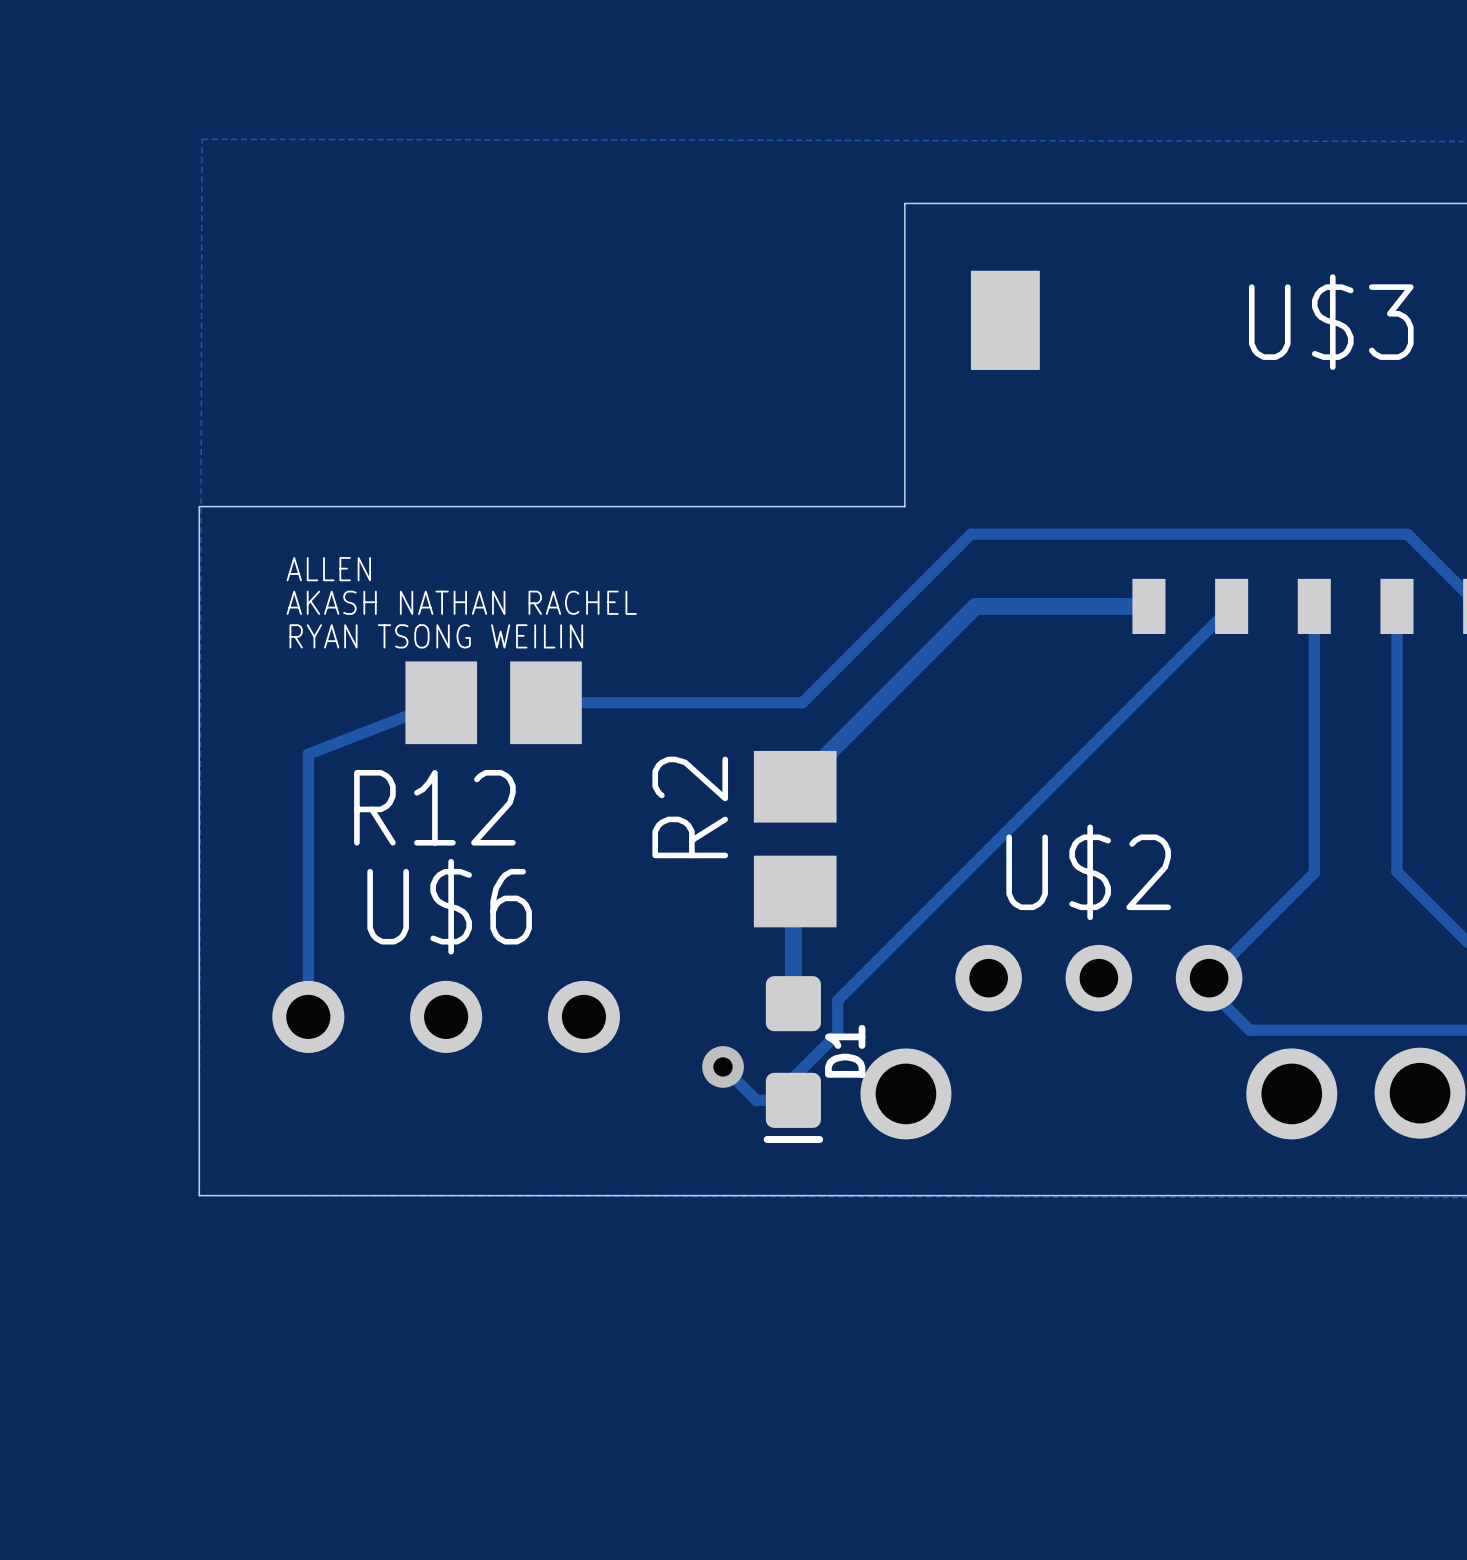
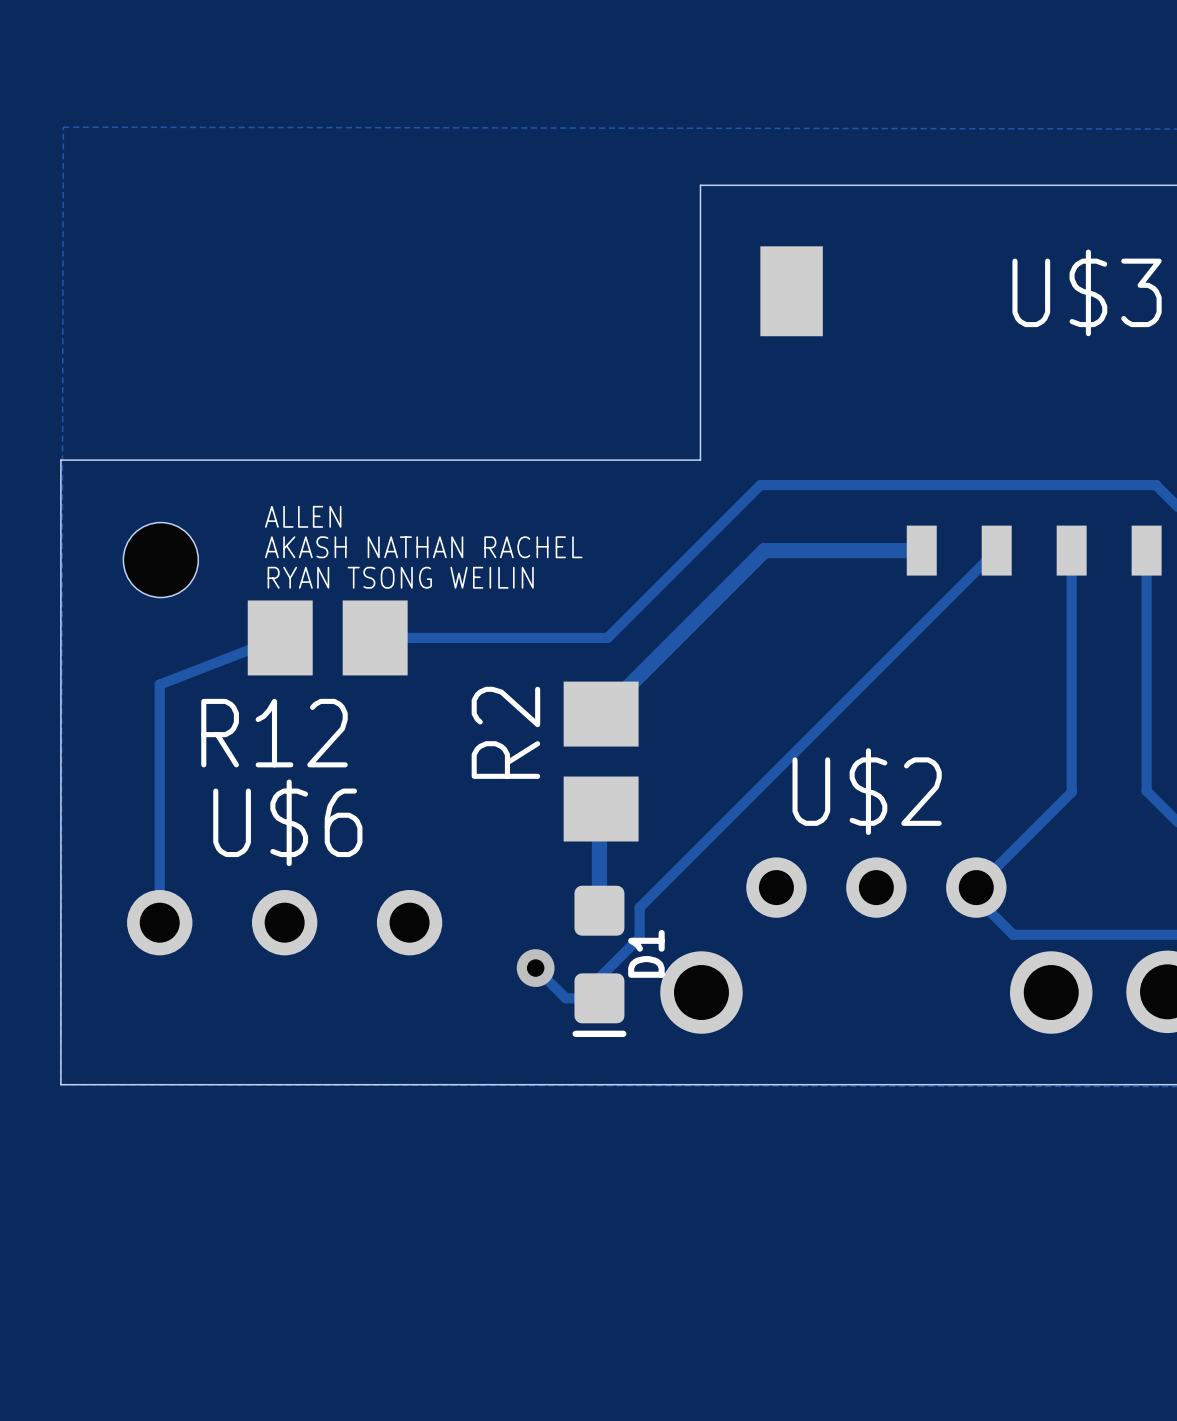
text position: ALLEN (328, 569) -> ALLEN (303, 516)
text position: AKASH NATHAN RACHEL (461, 602) -> AKASH NATHAN RACHEL (423, 547)
hole: none -> (160, 560)
text position: RYAN TSONG WEILIN (436, 636) -> RYAN TSONG WEILIN (400, 577)

